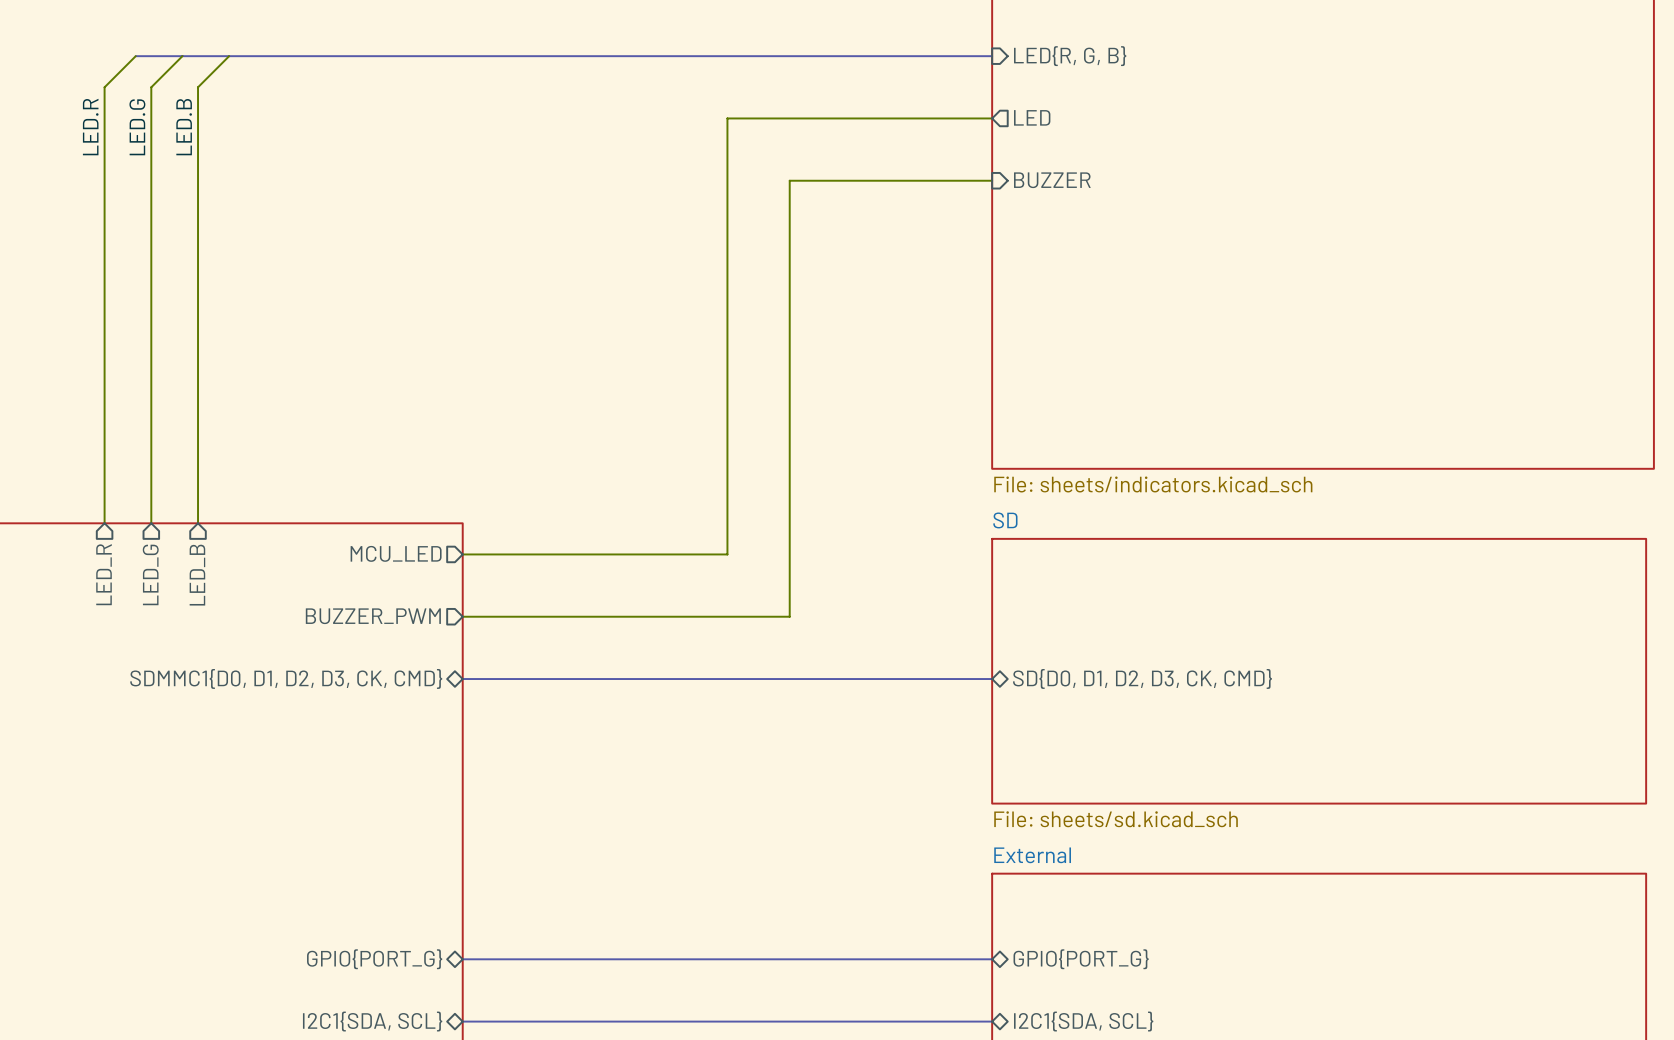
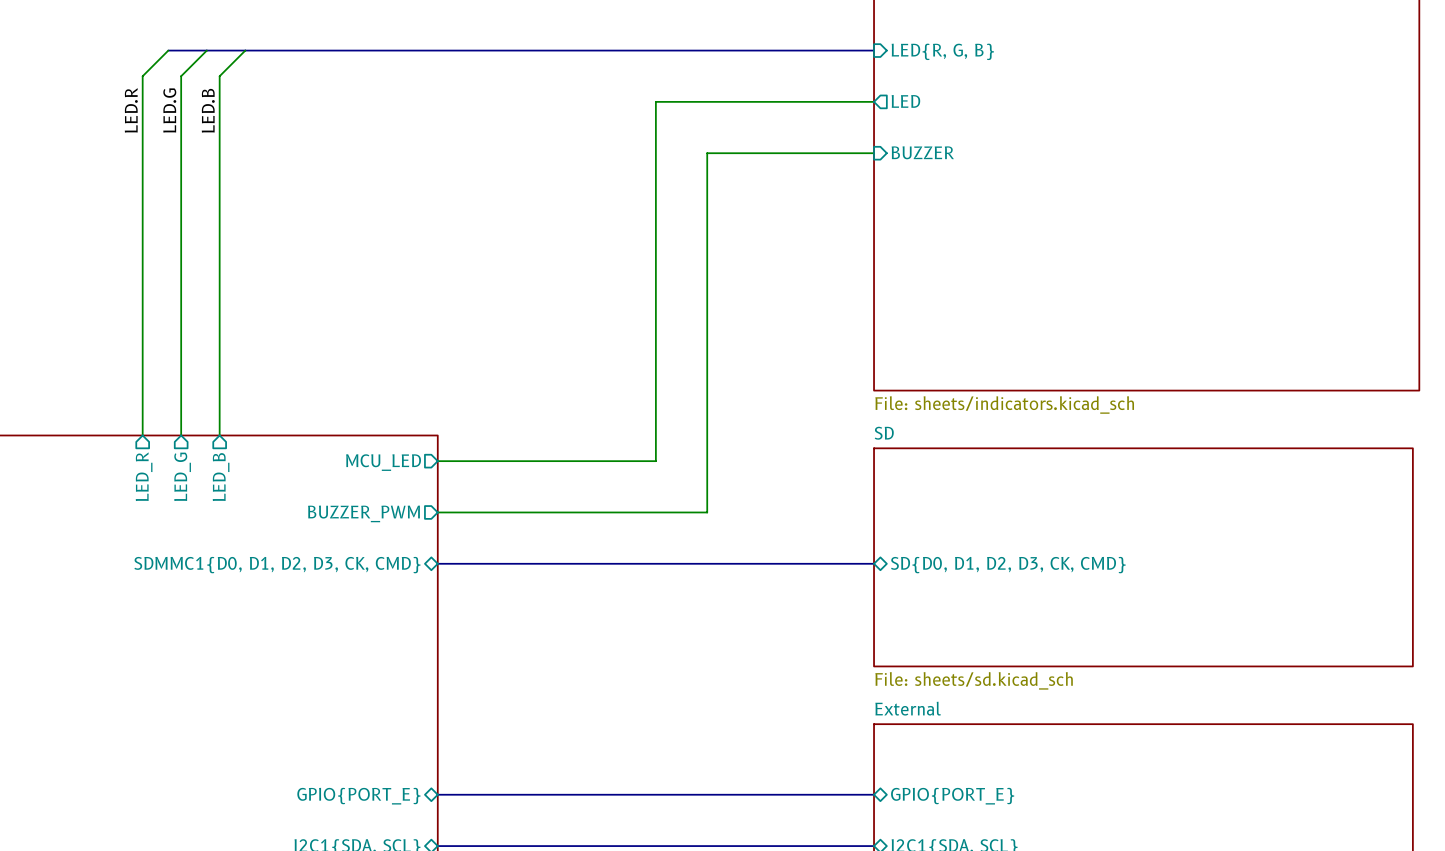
sheet pin: GPIO{PORT_G} (374, 959) -> GPIO{PORT_E} (358, 796)
sheet pin: GPIO{PORT_G} (1081, 959) -> GPIO{PORT_E} (952, 796)

